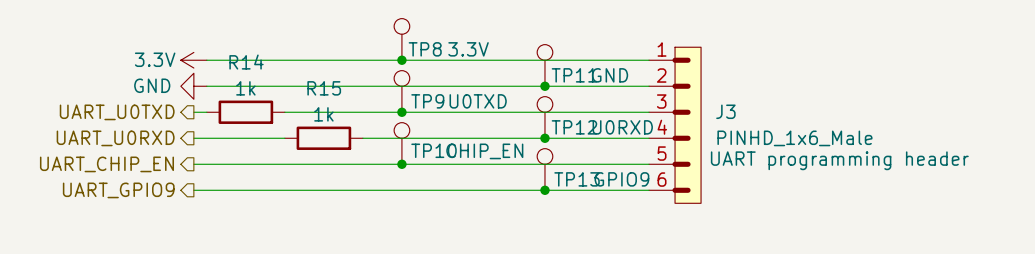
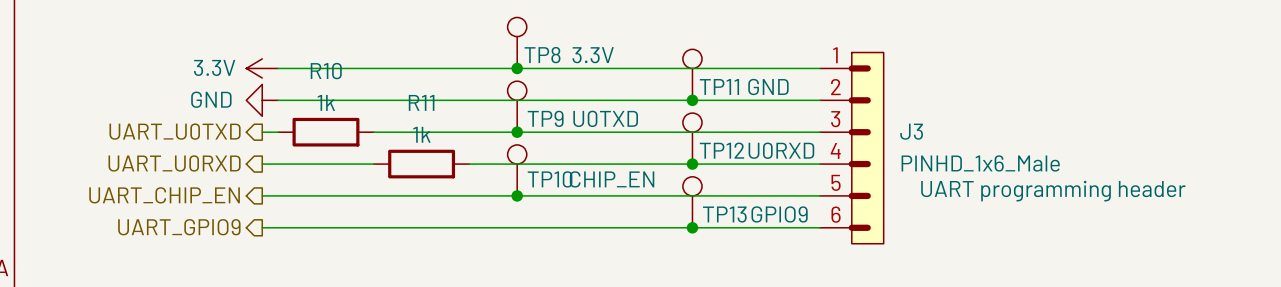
R14 name: R14 (246, 62) -> R10 (326, 71)
R15 name: R15 (324, 88) -> R11 (421, 102)

